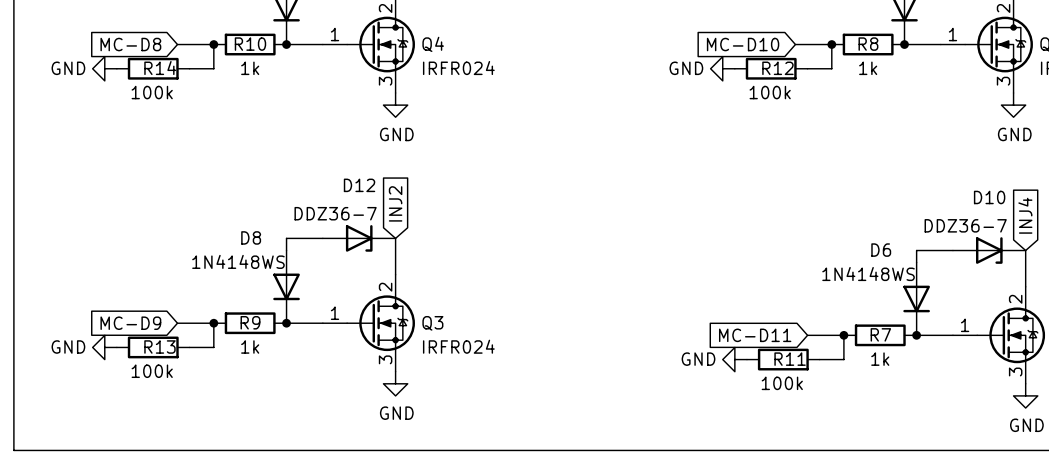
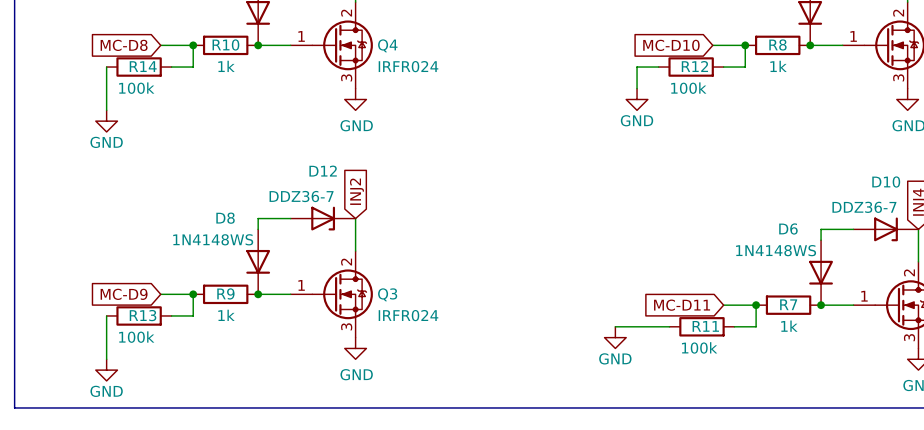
power symbol rotation: 0° (104, 68) -> 90° counterclockwise (106, 121)
power symbol position: GND (104, 68) -> GND (106, 121)
wire: none -> (106, 67) (106, 110)
power symbol rotation: 0° (722, 68) -> 90° counterclockwise (637, 99)
power symbol position: GND (722, 68) -> GND (637, 99)
wire: none -> (658, 67) (637, 67) (637, 88)
power symbol rotation: 0° (104, 347) -> 90° counterclockwise (106, 370)
power symbol position: GND (104, 347) -> GND (106, 370)
wire: none -> (106, 315) (106, 359)
wire: none -> (615, 326) (669, 326)
power symbol rotation: 0° (734, 359) -> 90° counterclockwise (615, 337)
power symbol position: GND (734, 359) -> GND (615, 337)

